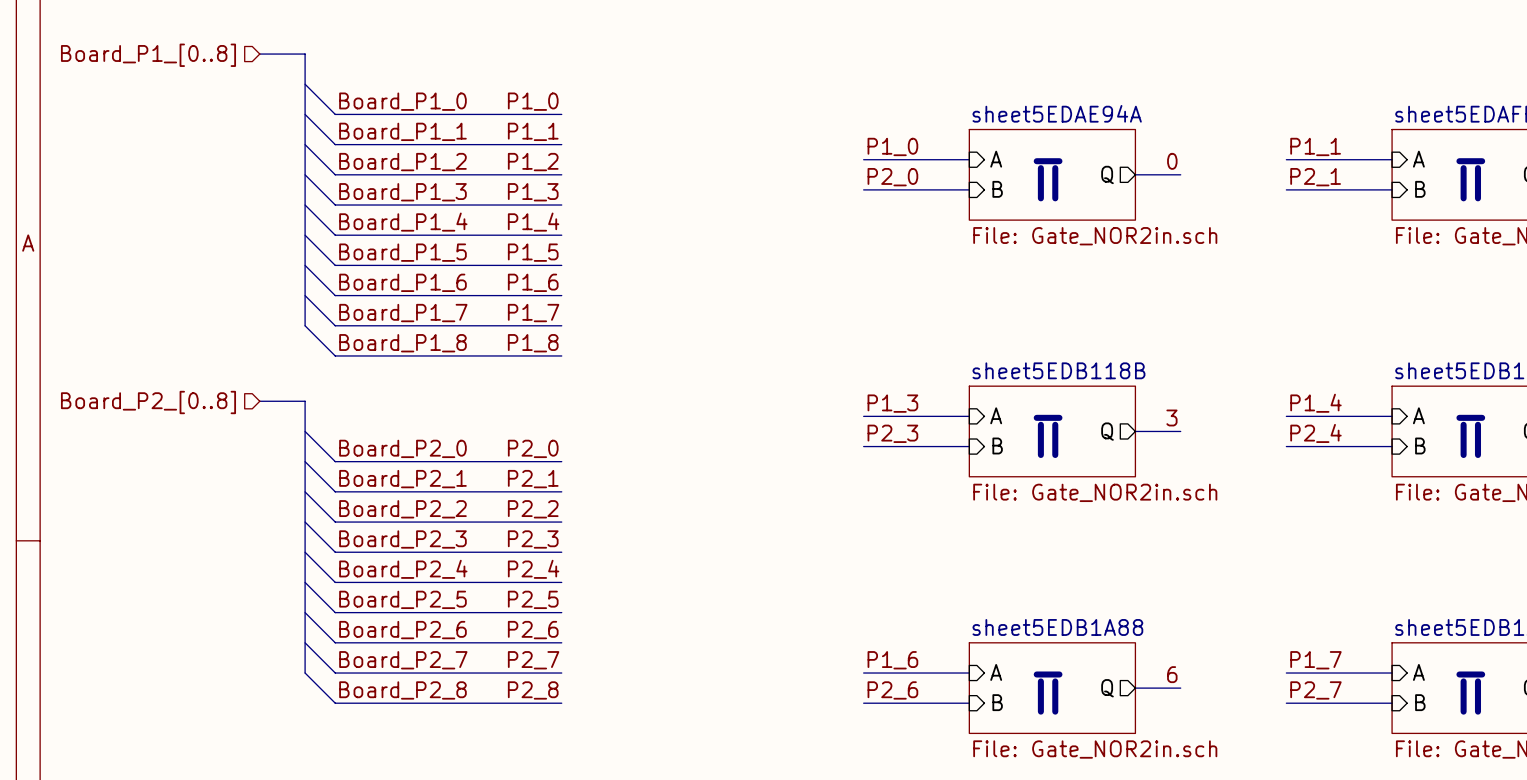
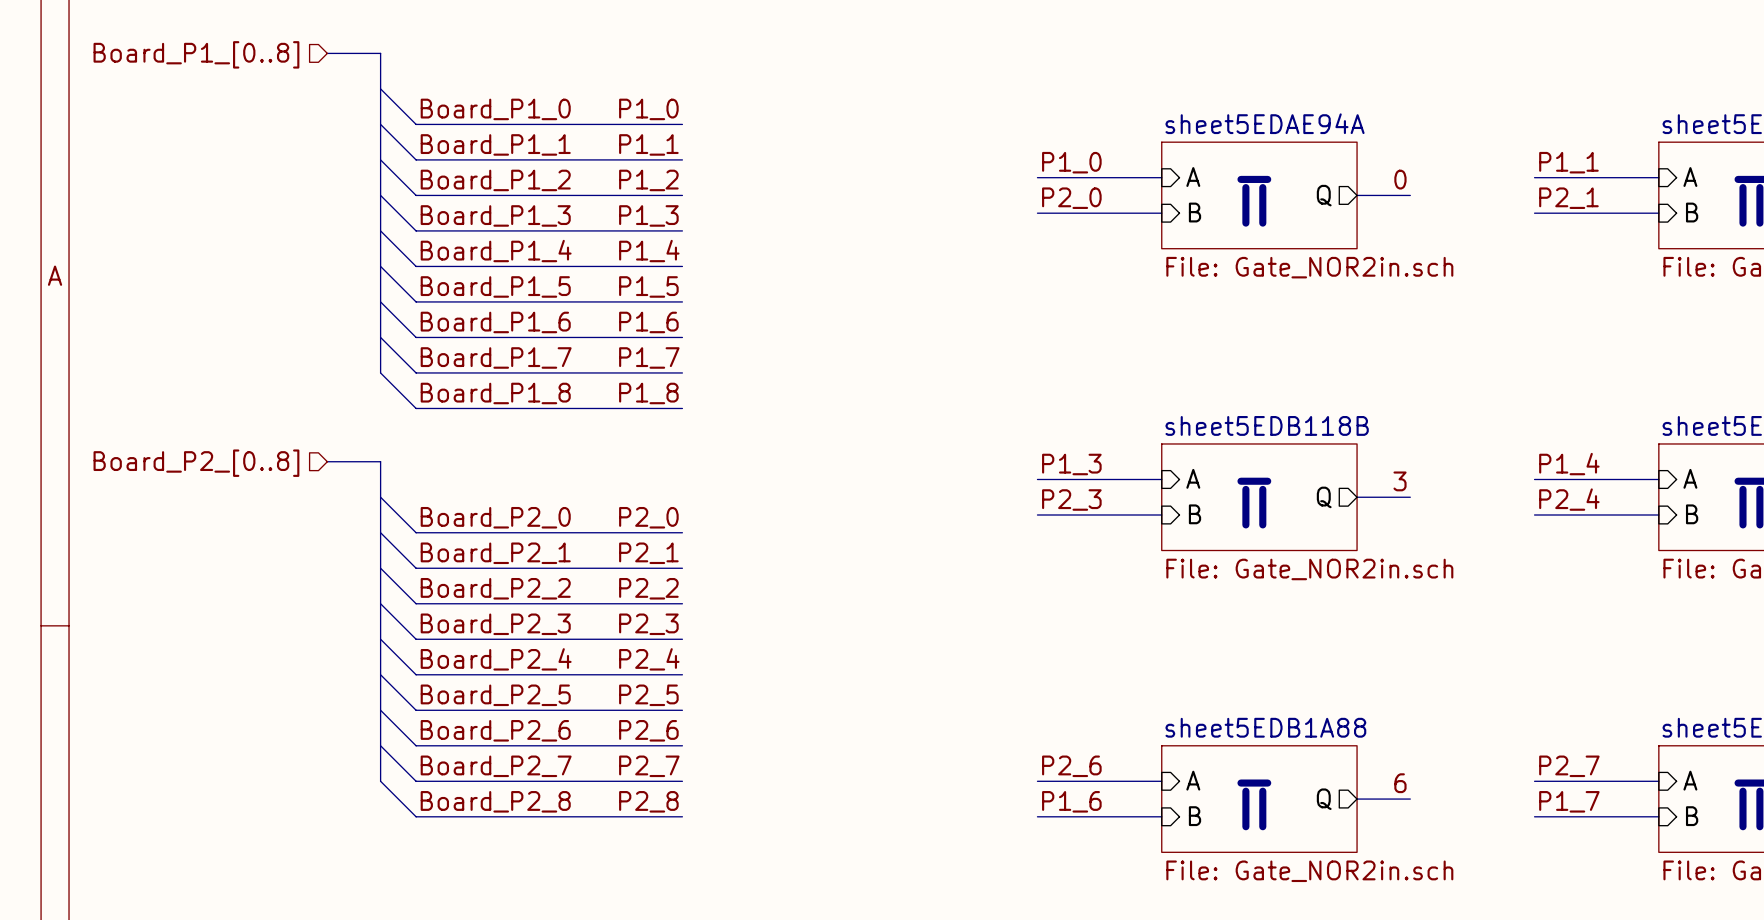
label: P1_6 (892, 660) -> P2_6 (1071, 766)
label: P1_7 (1315, 660) -> P2_7 (1569, 766)
label: P2_6 (892, 690) -> P1_6 (1071, 801)
label: P2_7 (1315, 690) -> P1_7 (1569, 801)

